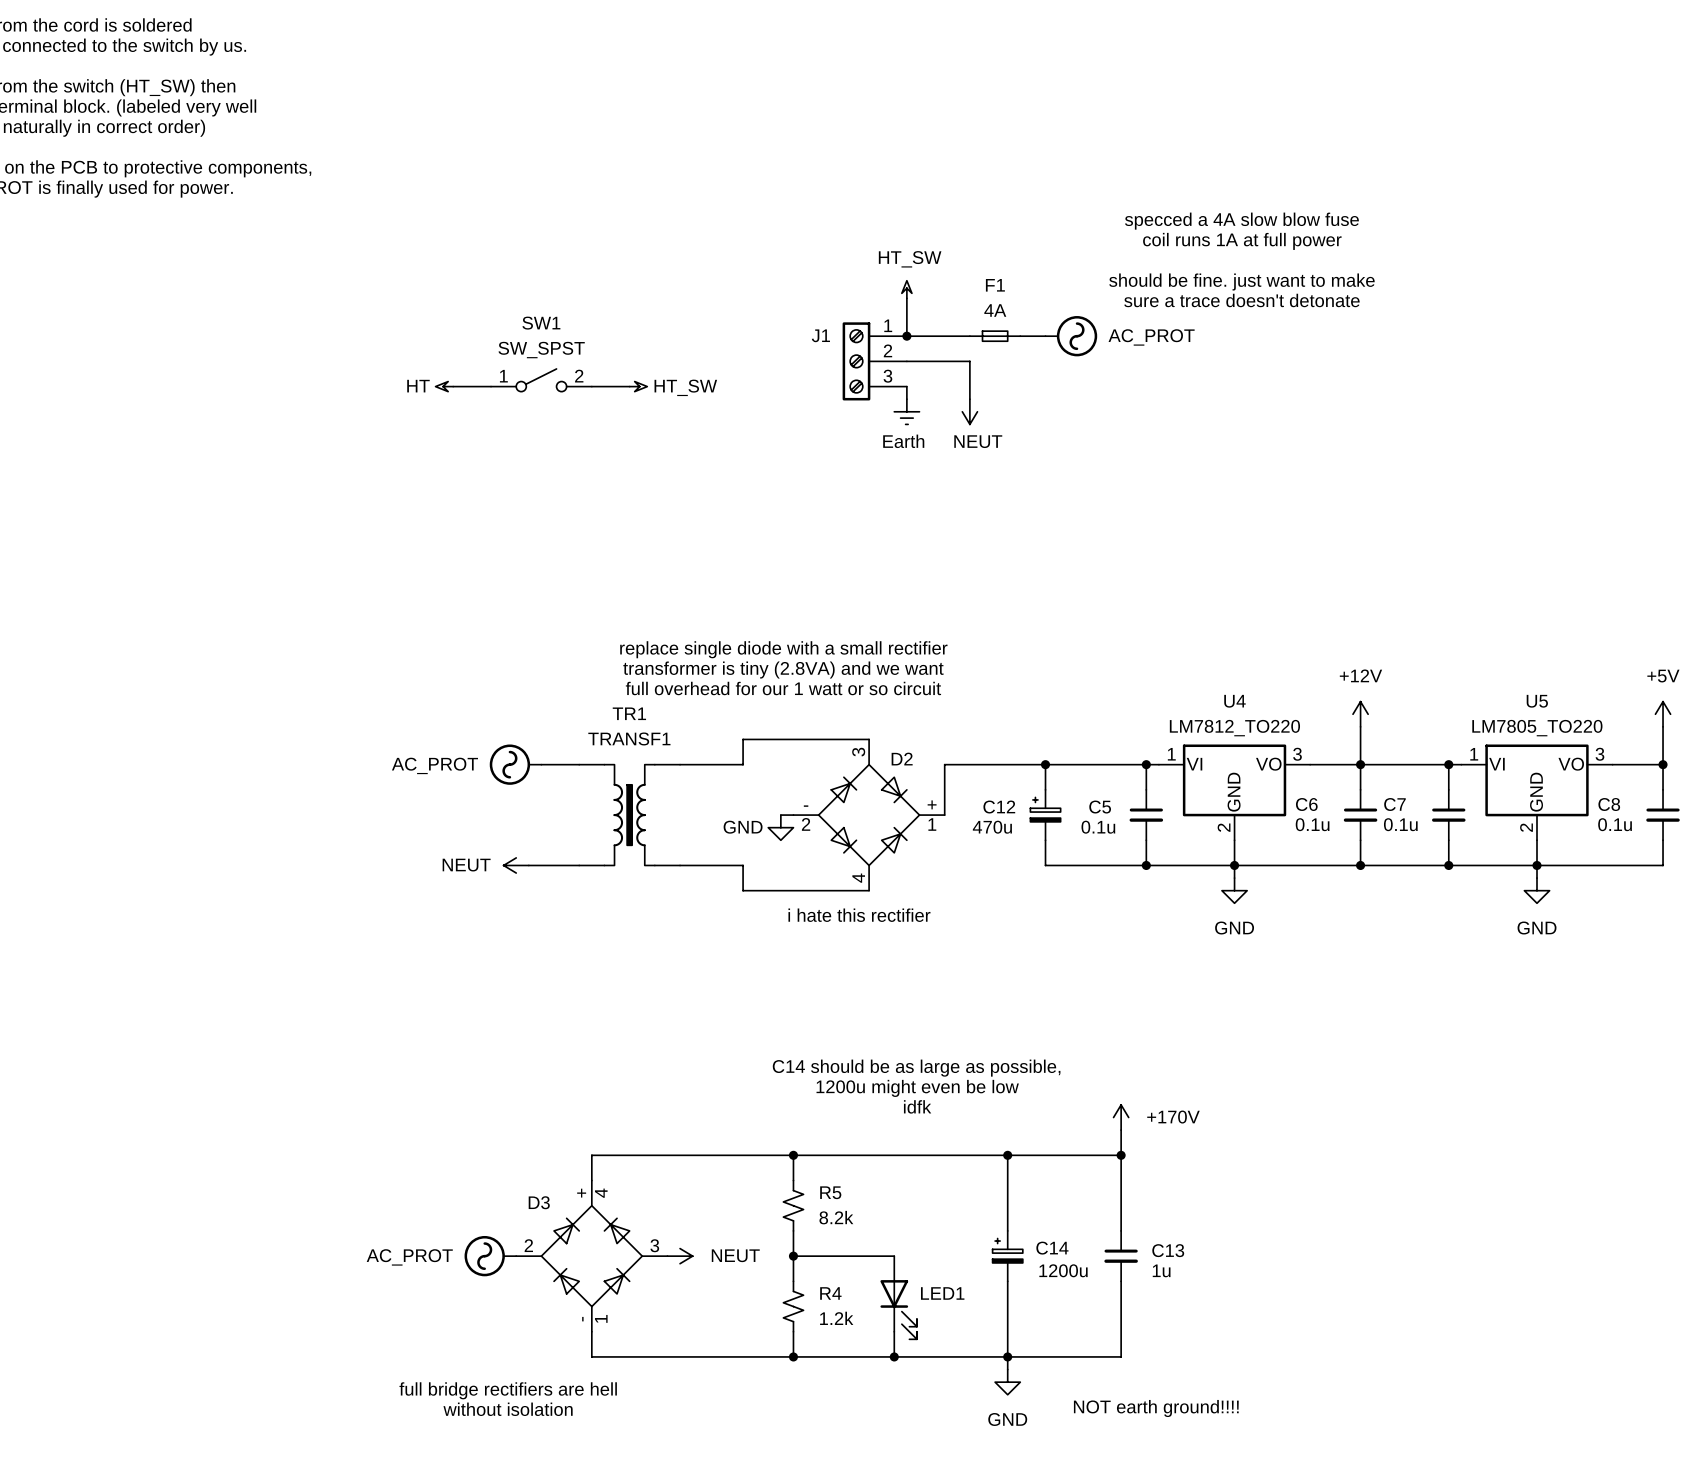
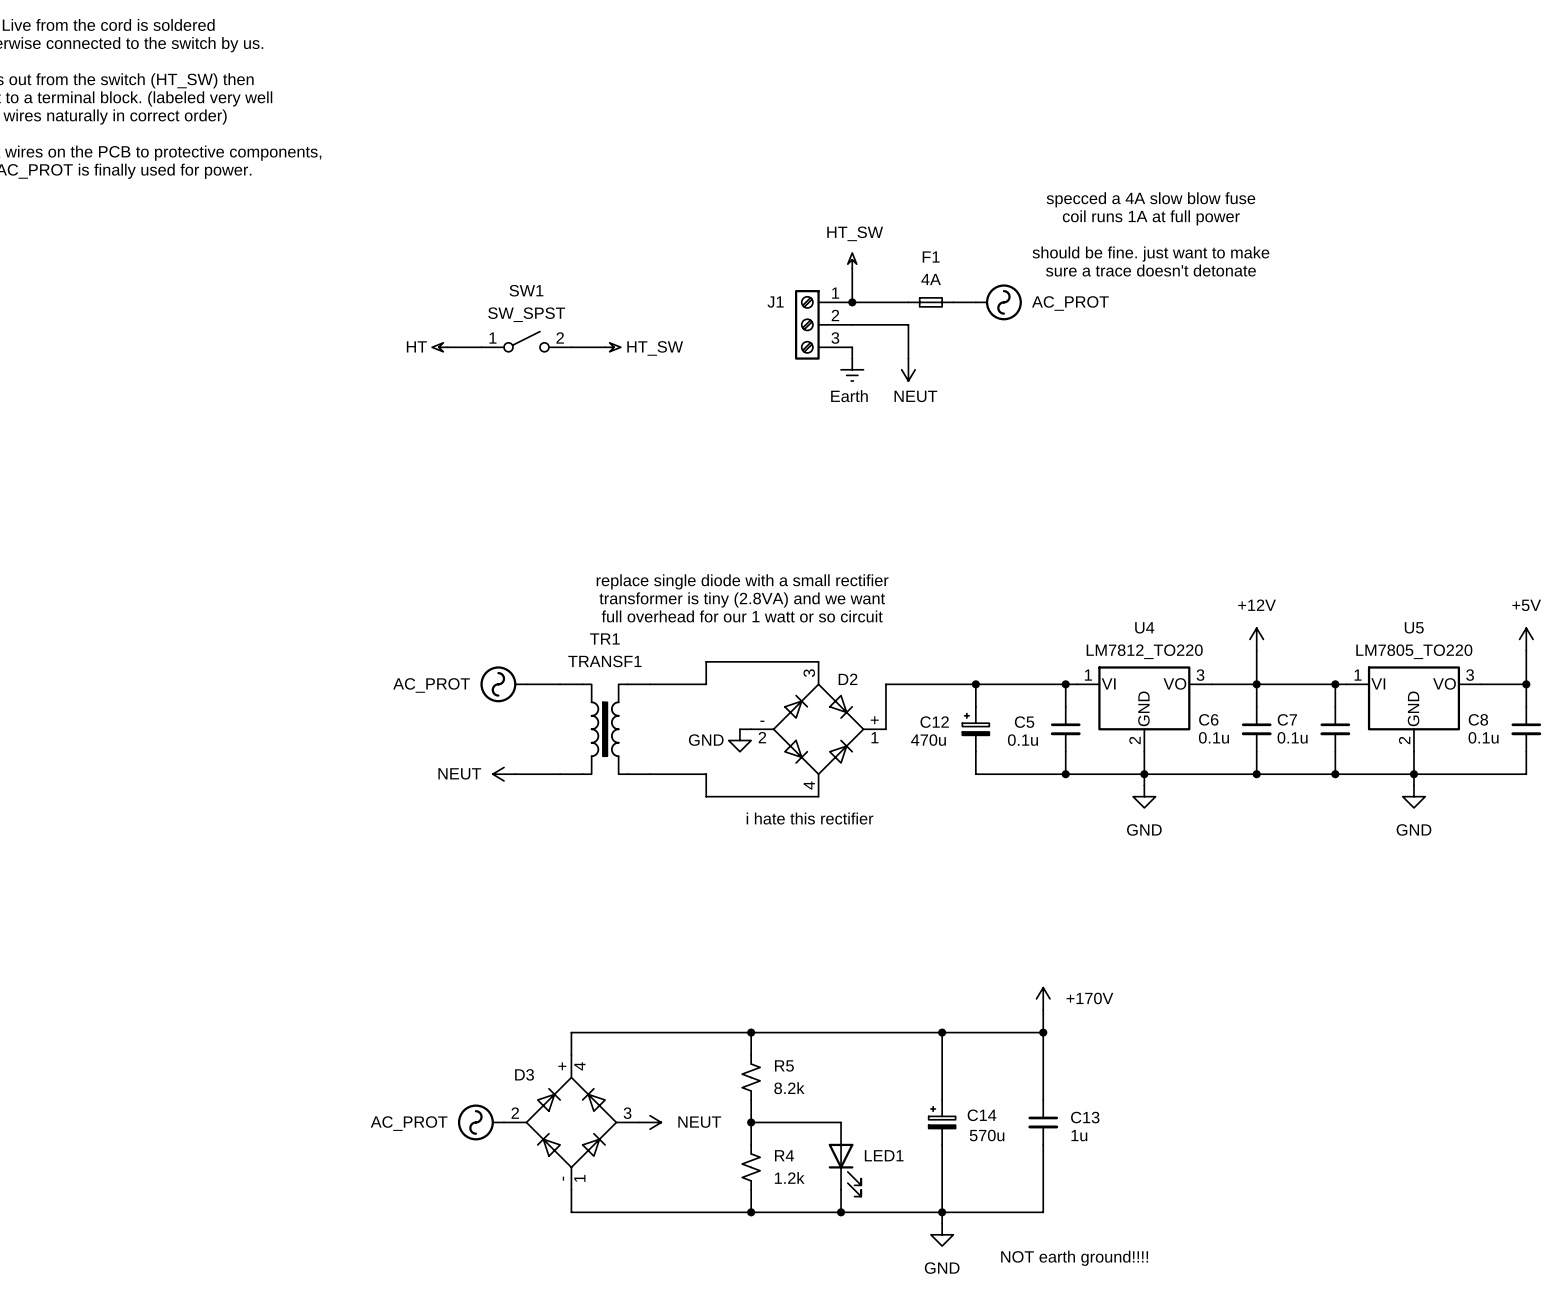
text: C14 should be as large as possible, (916, 1068) -> none
text: 1200u might even be low (917, 1088) -> none
text: idfk (917, 1106) -> none
C14 value: 1200u (1063, 1270) -> 570u (987, 1135)
text: full bridge rectifiers are hell (508, 1390) -> none
text: without isolation (508, 1409) -> none

